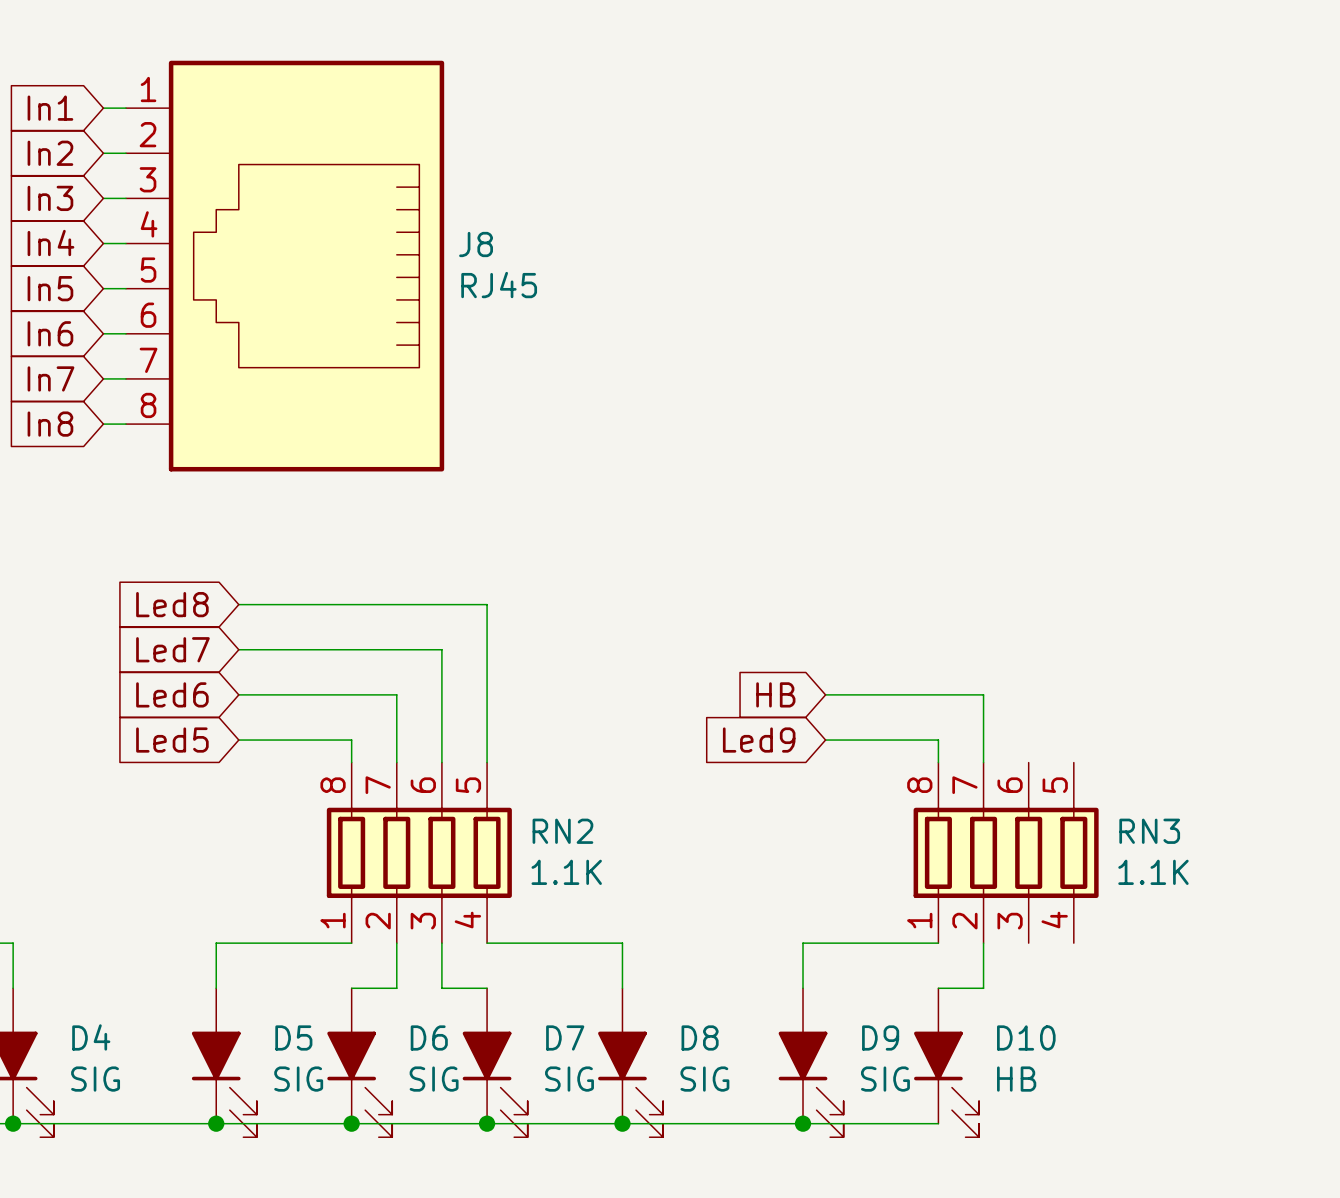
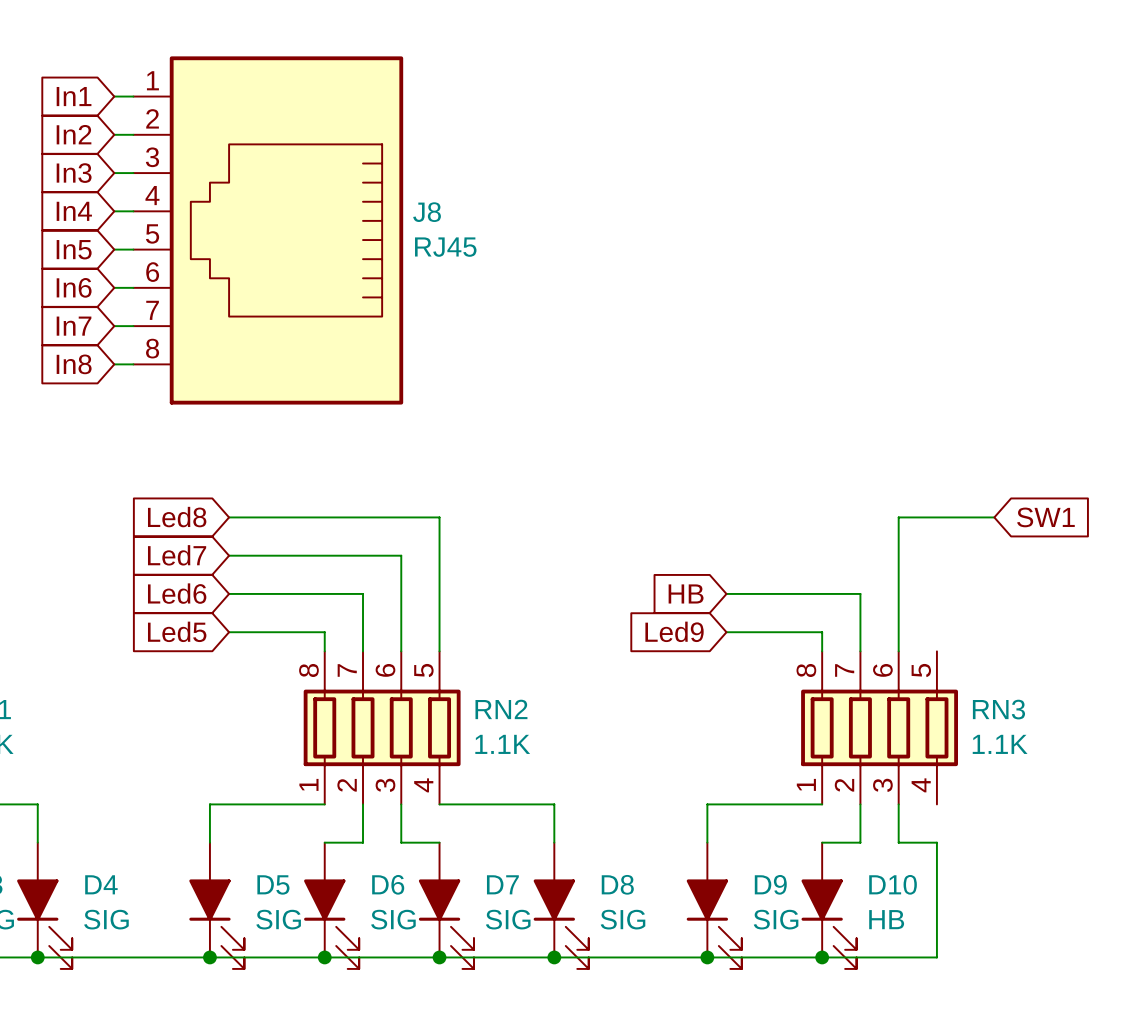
wire: none -> (994, 517) (898, 517) (898, 651)
global label: none -> SW1 (1045, 517)
wire: none -> (898, 804) (898, 842) (936, 842) (936, 957) (822, 957)
junction: none -> (822, 957)

